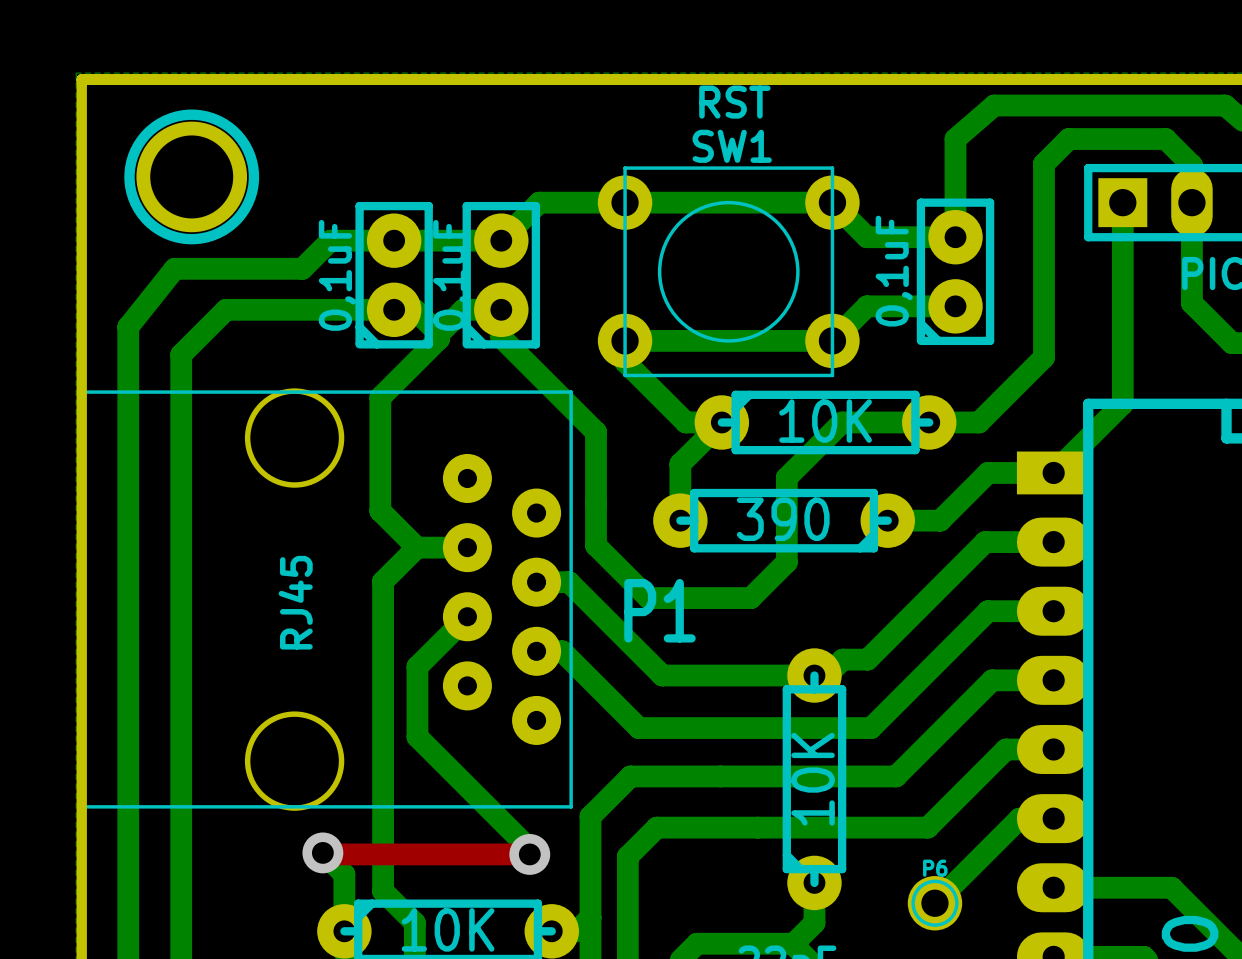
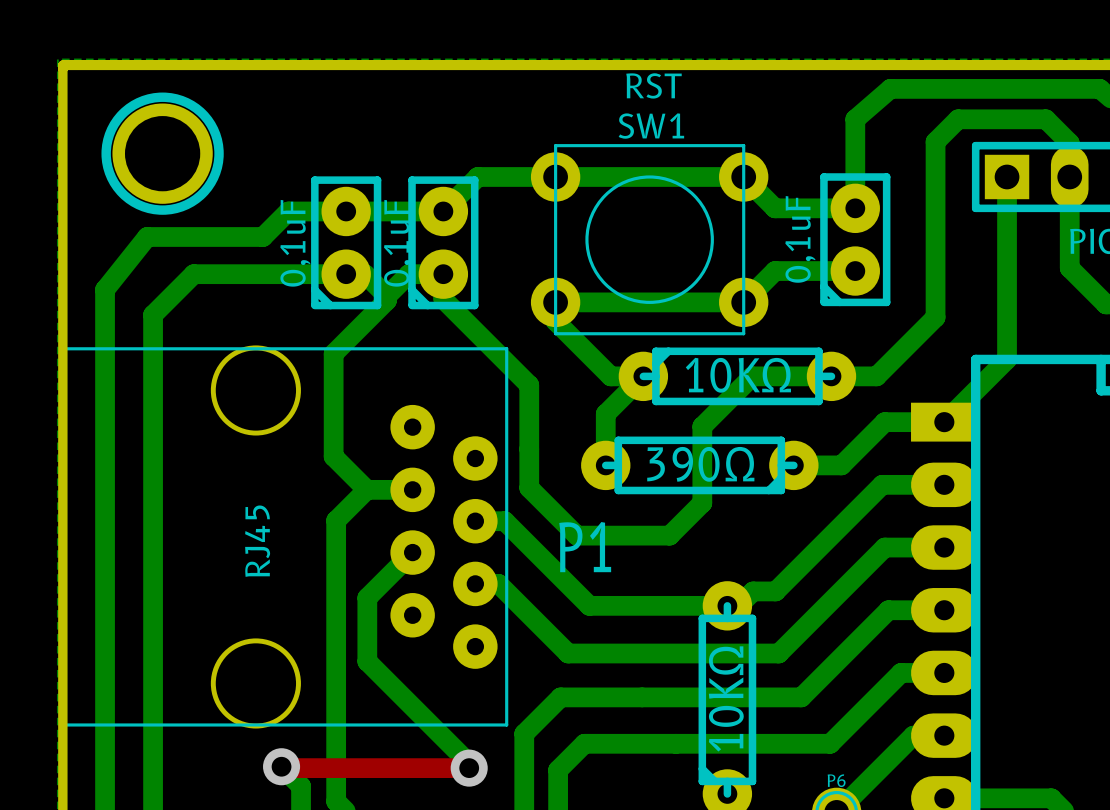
part value: 10K (825, 421) -> 10KΩ (738, 375)
part value: 390 (783, 519) -> 390Ω (700, 464)
part value: 10K (813, 779) -> 10KΩ (726, 698)

